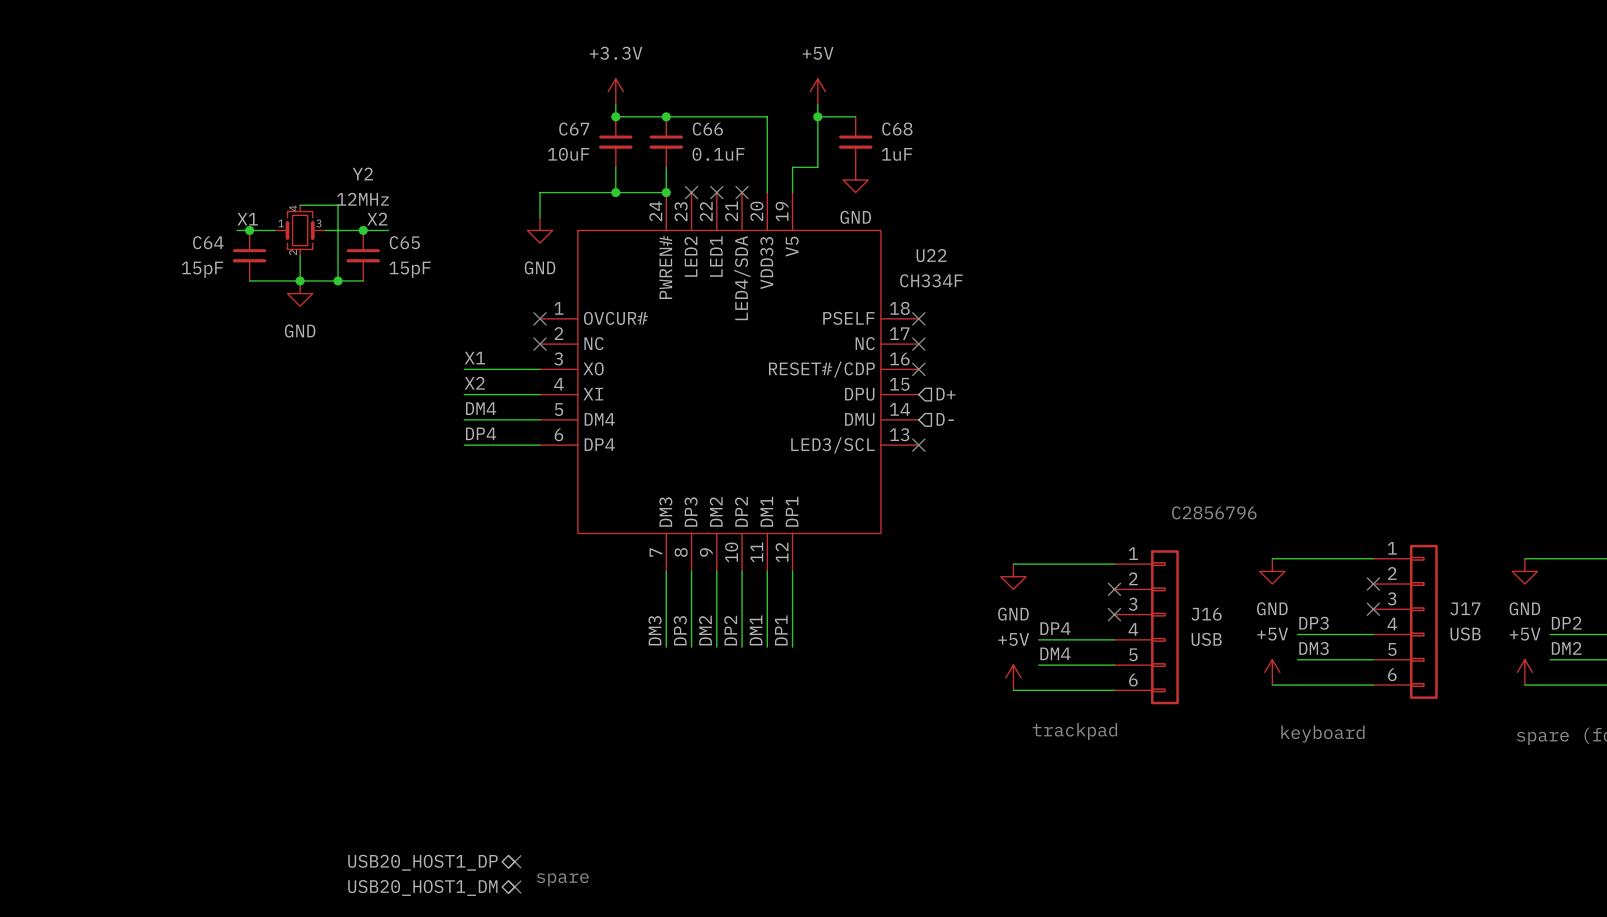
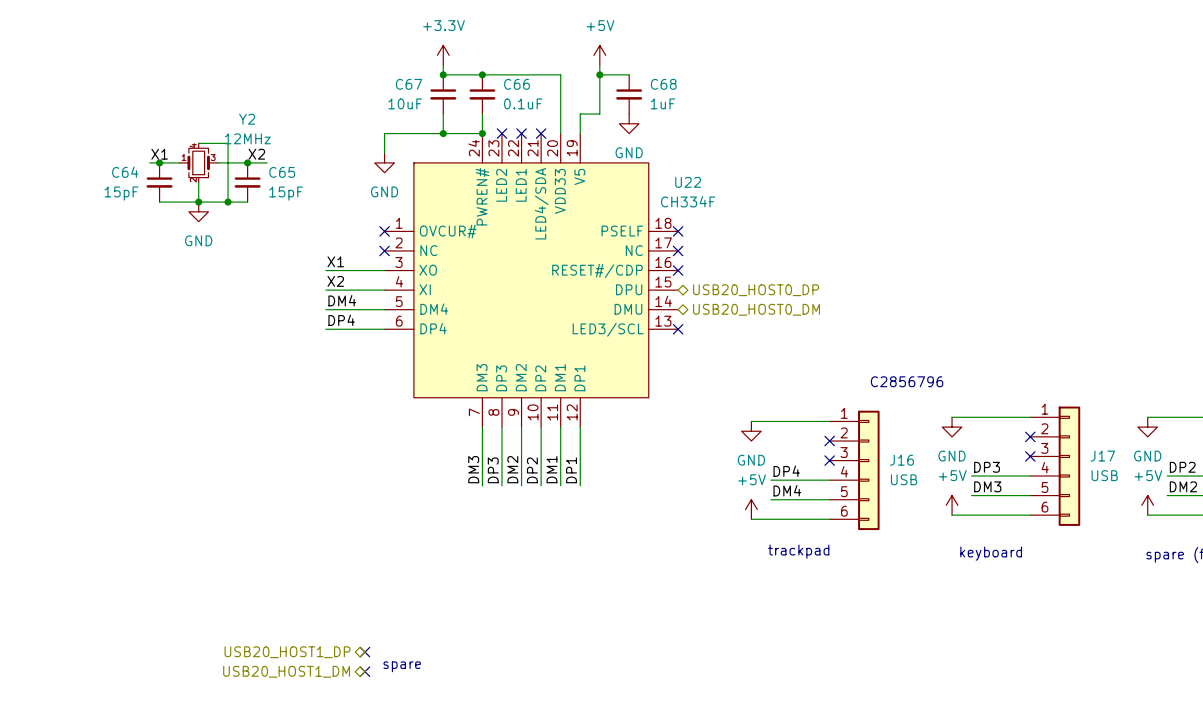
hierarchical label shape: input (946, 394) -> bidirectional (756, 290)
hierarchical label: D+ (946, 394) -> USB20_HOST0_DP (756, 290)
hierarchical label shape: input (945, 419) -> bidirectional (756, 309)
hierarchical label: D- (945, 419) -> USB20_HOST0_DM (756, 309)

